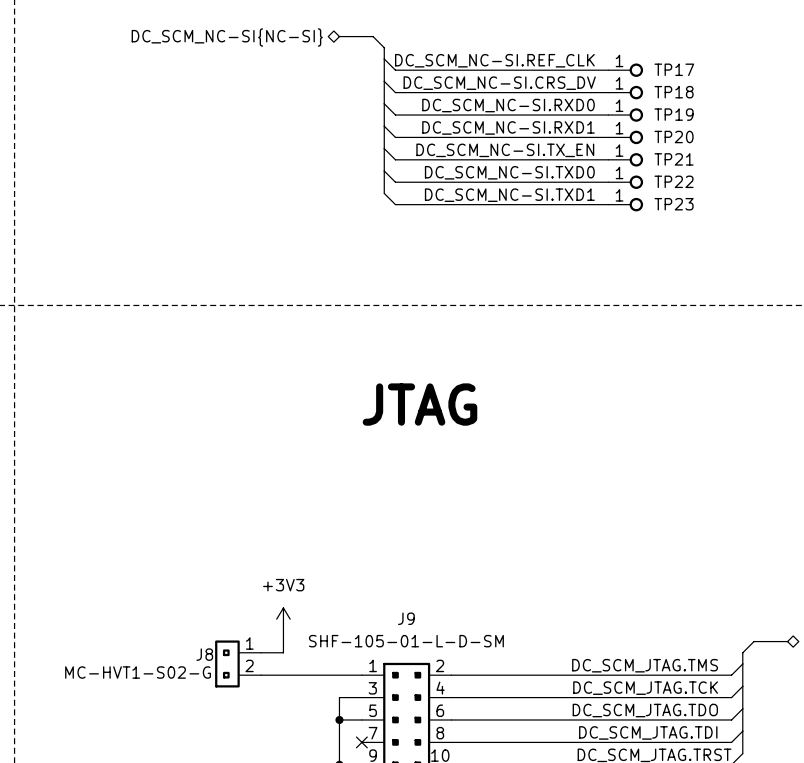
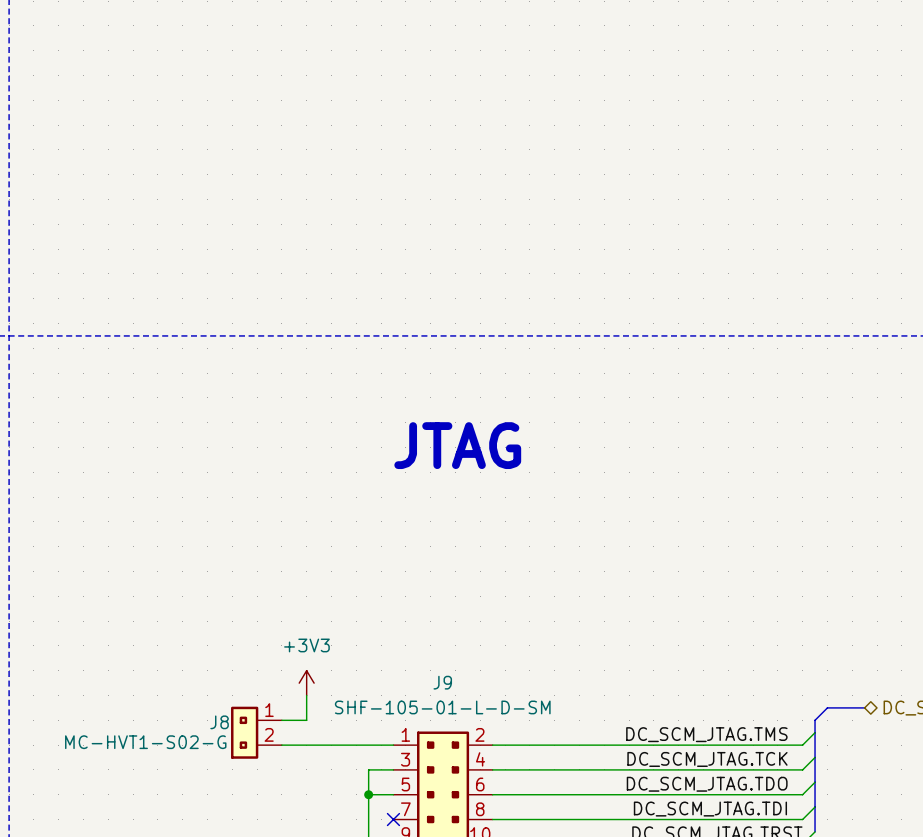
bus: (339, 36) (373, 36) (384, 47) (384, 193) -> none
hierarchical label: DC_SCM_NC-SI{NC-SI} (227, 37) -> none
wire: (384, 58) (395, 70) (608, 70) -> none
label: DC_SCM_NC-SI.REF_CLK (494, 60) -> none
TP17: (625, 70) -> none
wire: (384, 81) (395, 92) (608, 92) -> none
label: DC_SCM_NC-SI.CRS_DV (499, 83) -> none
TP18: (625, 92) -> none
wire: (384, 103) (395, 115) (608, 115) -> none
label: DC_SCM_NC-SI.RXD0 (508, 105) -> none
TP19: (625, 115) -> none
wire: (384, 126) (395, 137) (608, 137) -> none
label: DC_SCM_NC-SI.RXD1 (508, 127) -> none
TP20: (625, 137) -> none
wire: (384, 148) (395, 159) (608, 159) -> none
label: DC_SCM_NC-SI.TX_EN (505, 150) -> none
TP21: (625, 159) -> none
wire: (384, 171) (395, 182) (608, 182) -> none
label: DC_SCM_NC-SI.TXD0 (509, 172) -> none
TP22: (625, 182) -> none
wire: (384, 193) (395, 204) (608, 204) -> none
label: DC_SCM_NC-SI.TXD1 (509, 195) -> none
TP23: (625, 204) -> none

